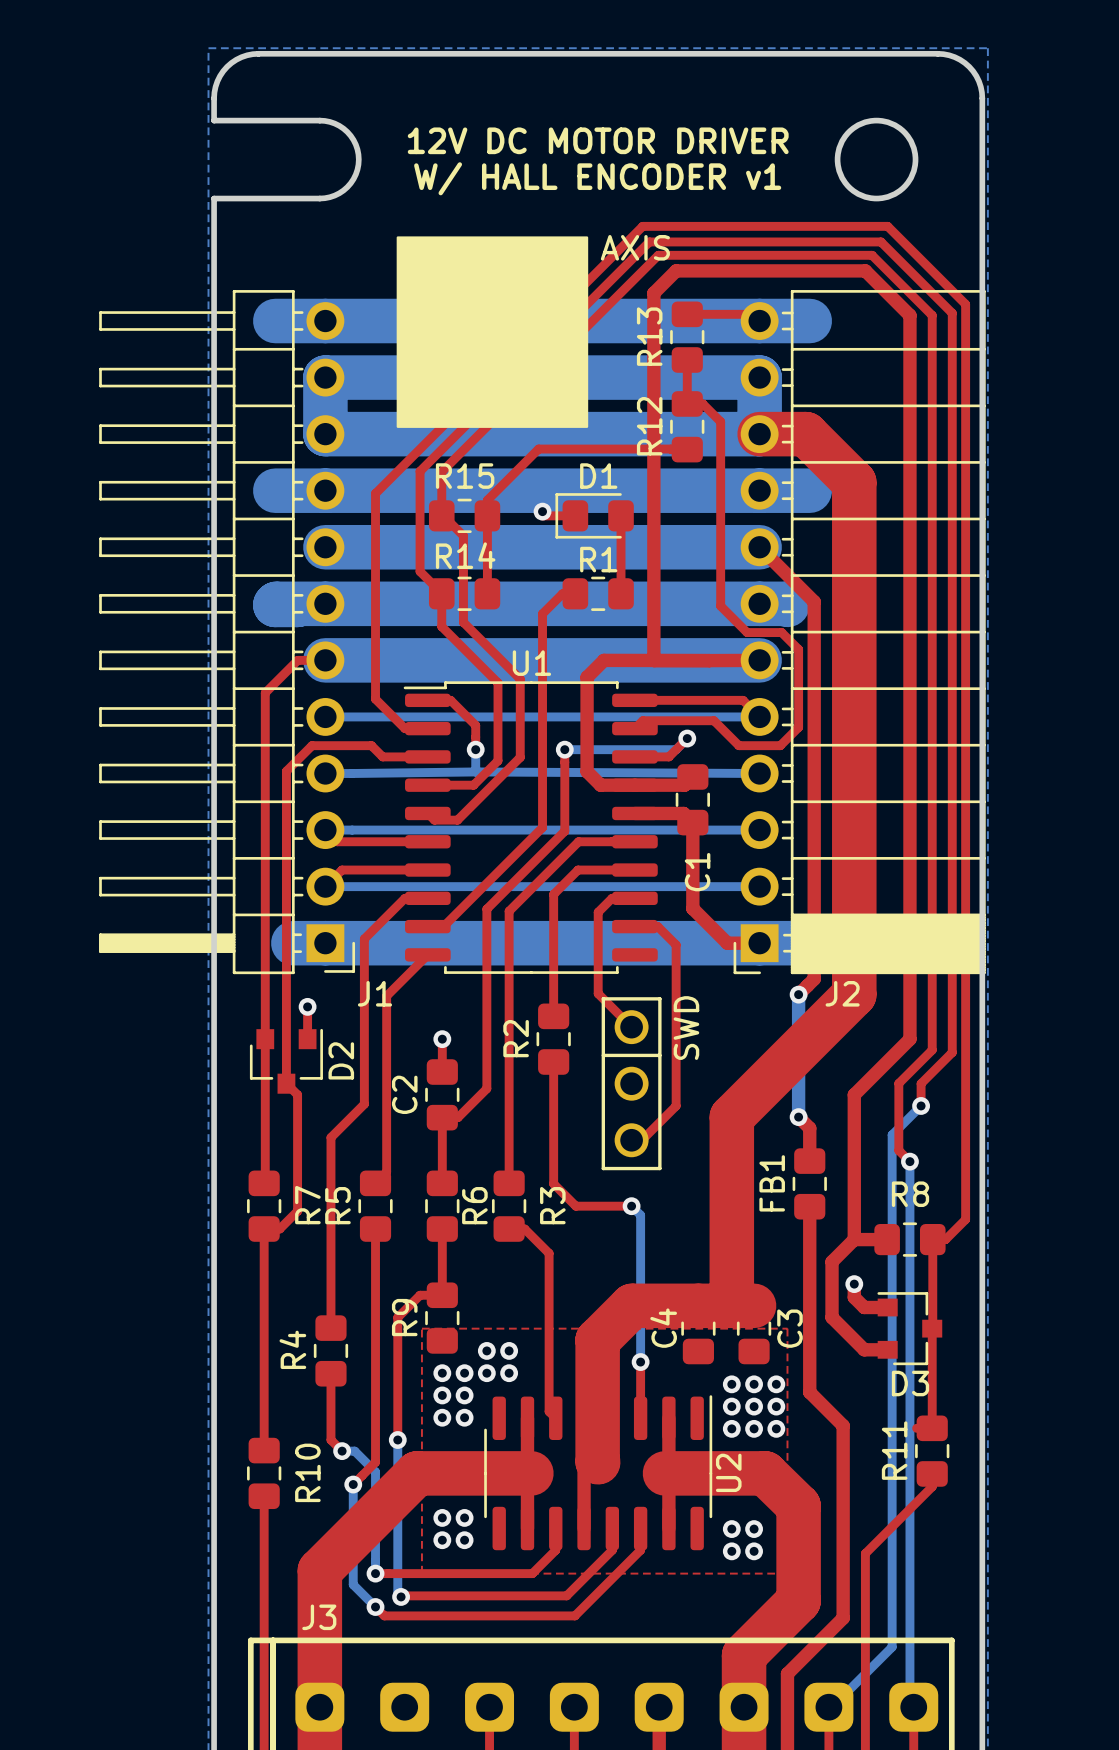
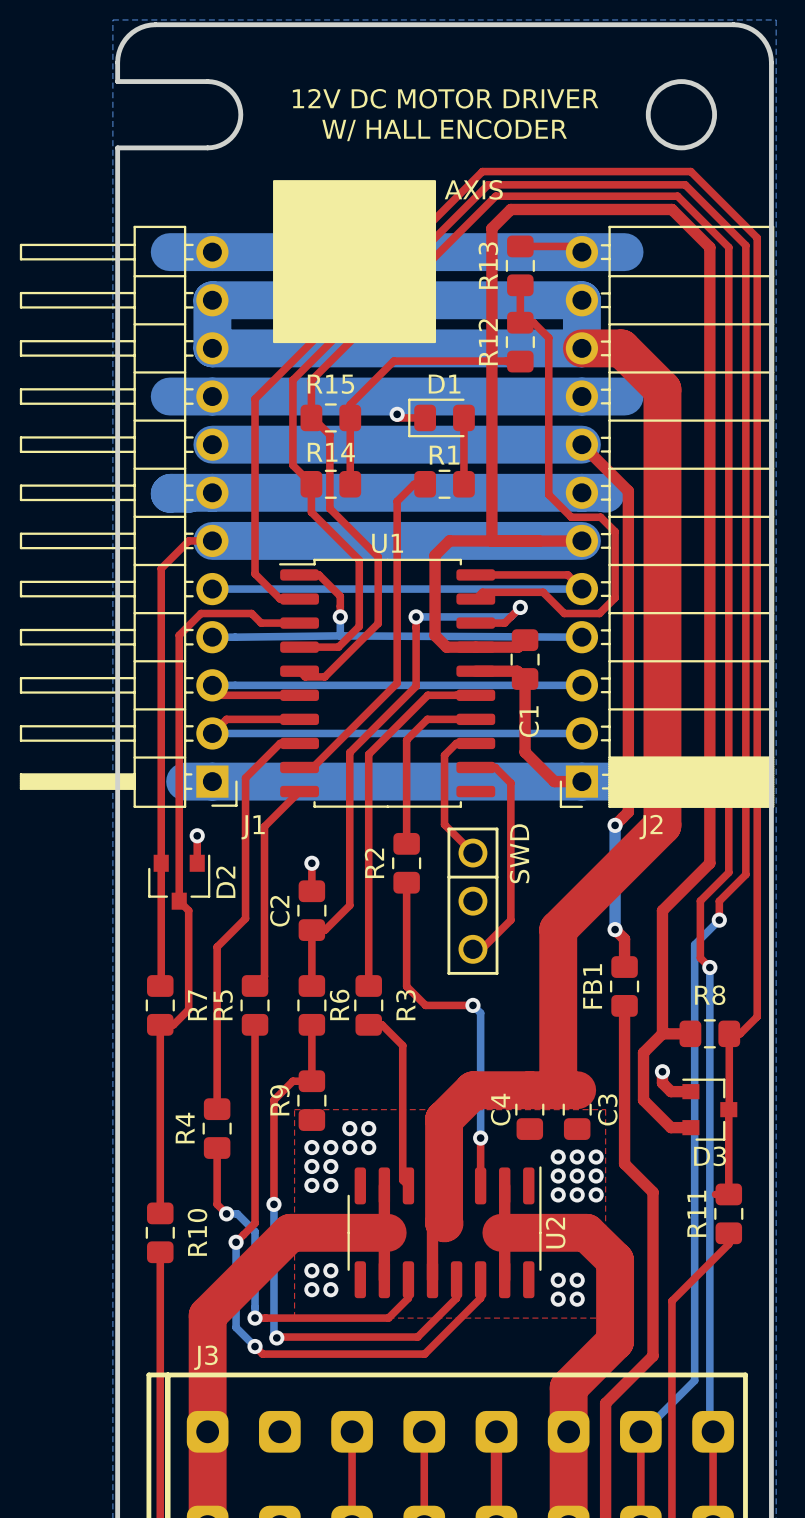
text: W/ HALL ENCODER v1 (597, 178) -> W/ HALL ENCODER (444, 130)

